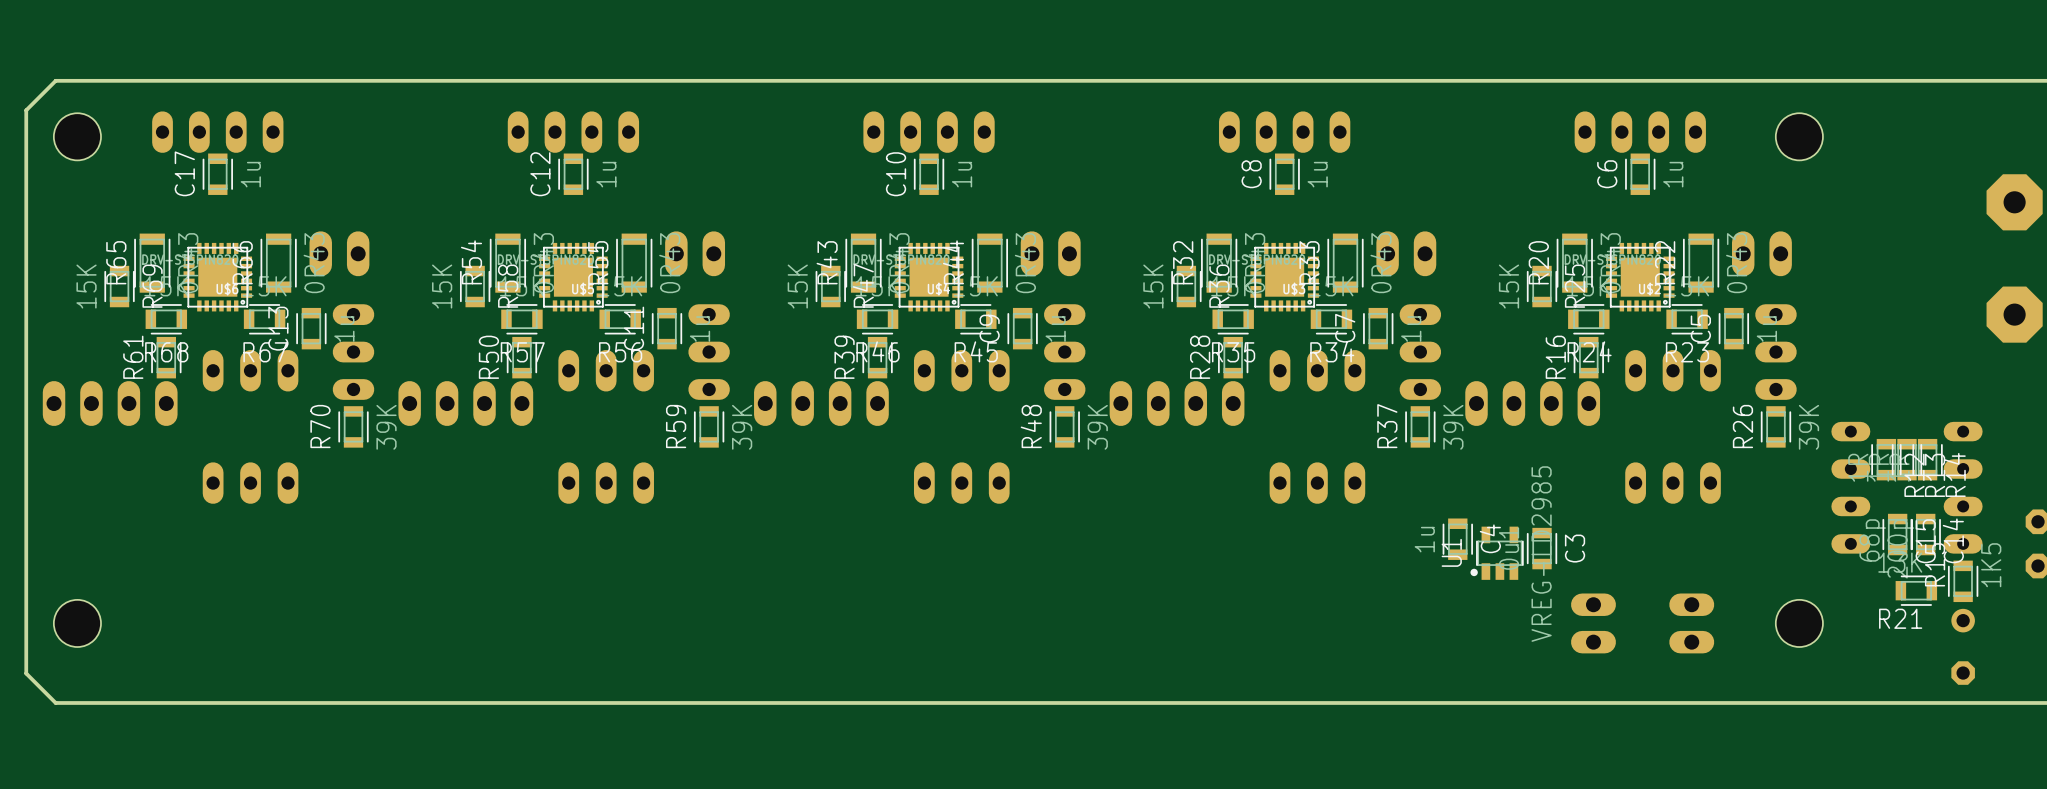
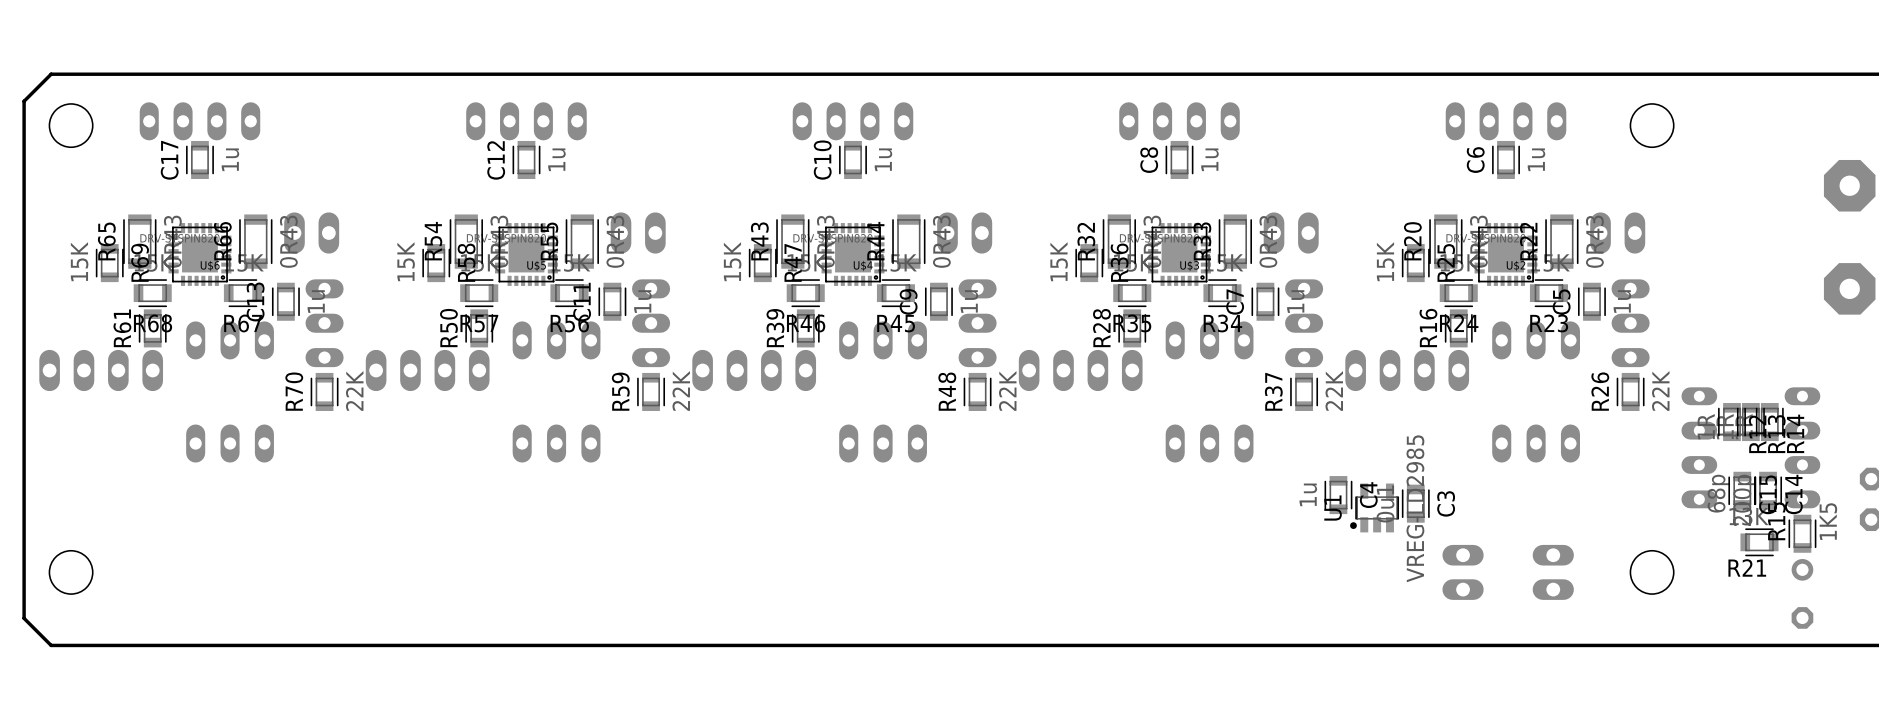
R70 value: 39K (386, 427) -> 22K (354, 390)
R59 value: 39K (742, 427) -> 22K (681, 390)
R48 value: 39K (1097, 427) -> 22K (1007, 390)
R37 value: 39K (1453, 427) -> 22K (1334, 390)
R26 value: 39K (1808, 427) -> 22K (1660, 390)

